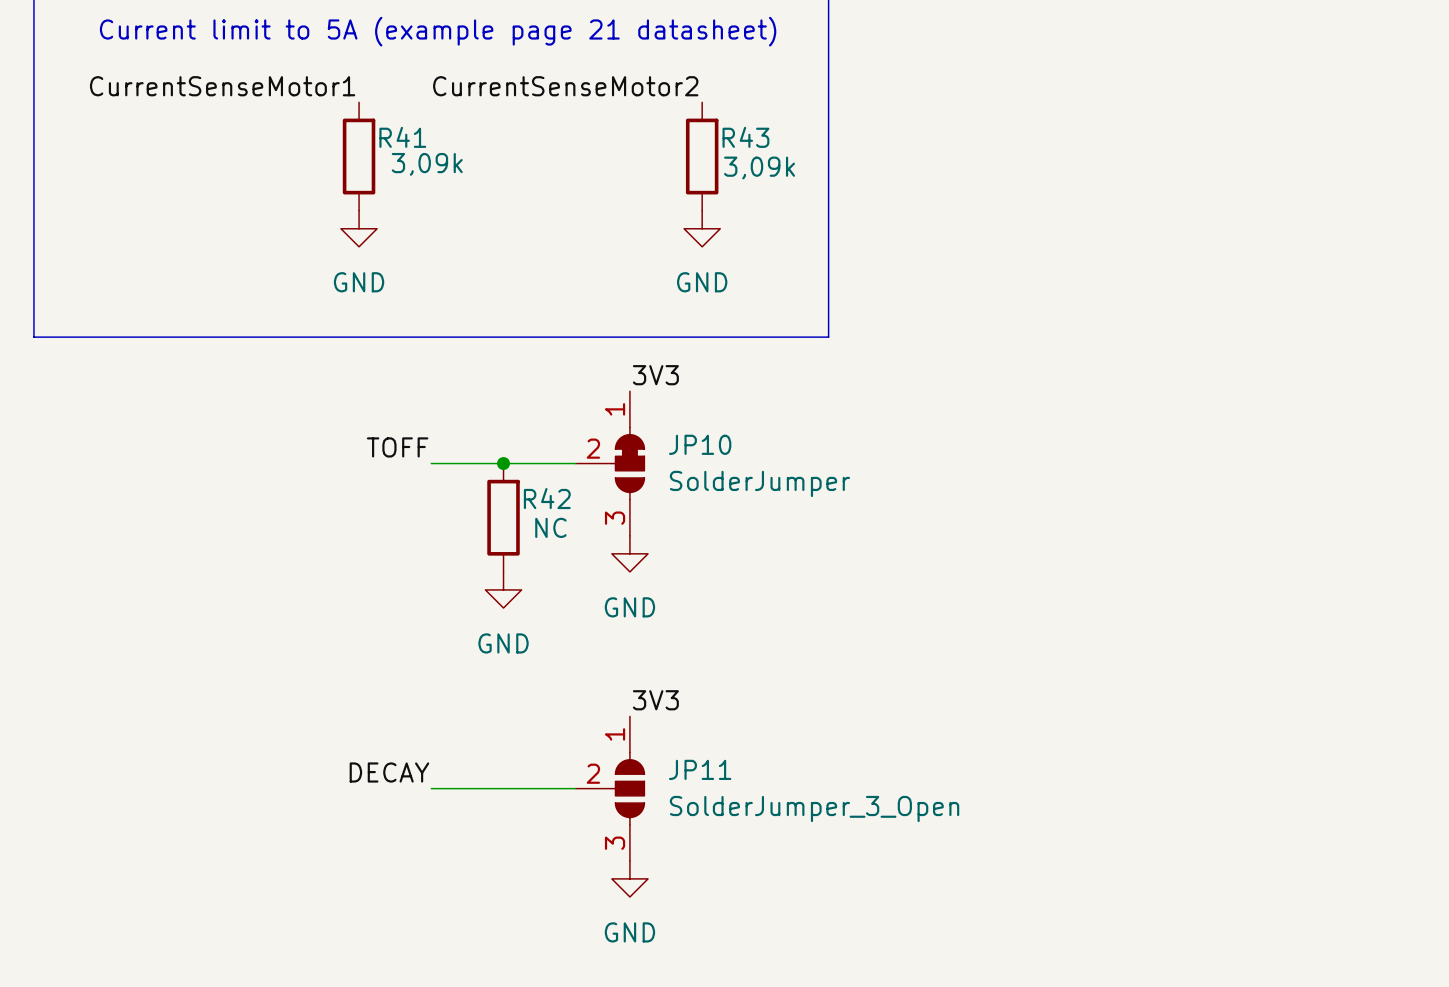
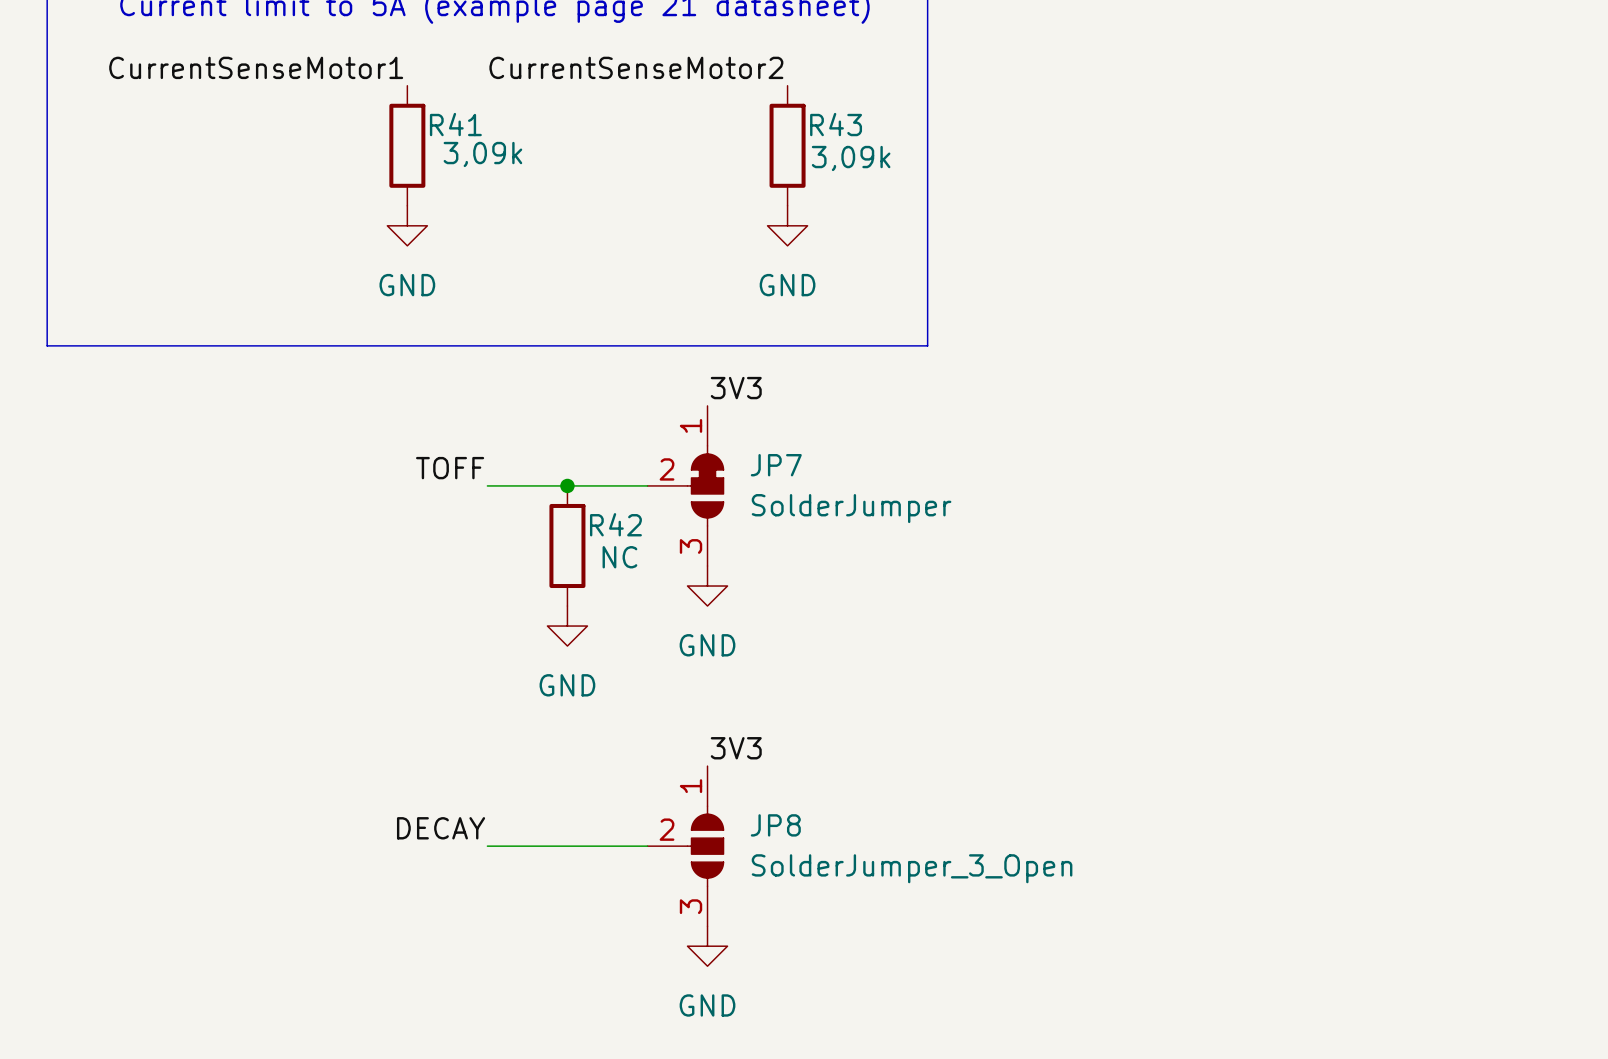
JP10 name: JP10 (700, 444) -> JP7 (776, 465)
JP11 name: JP11 (700, 769) -> JP8 (775, 825)

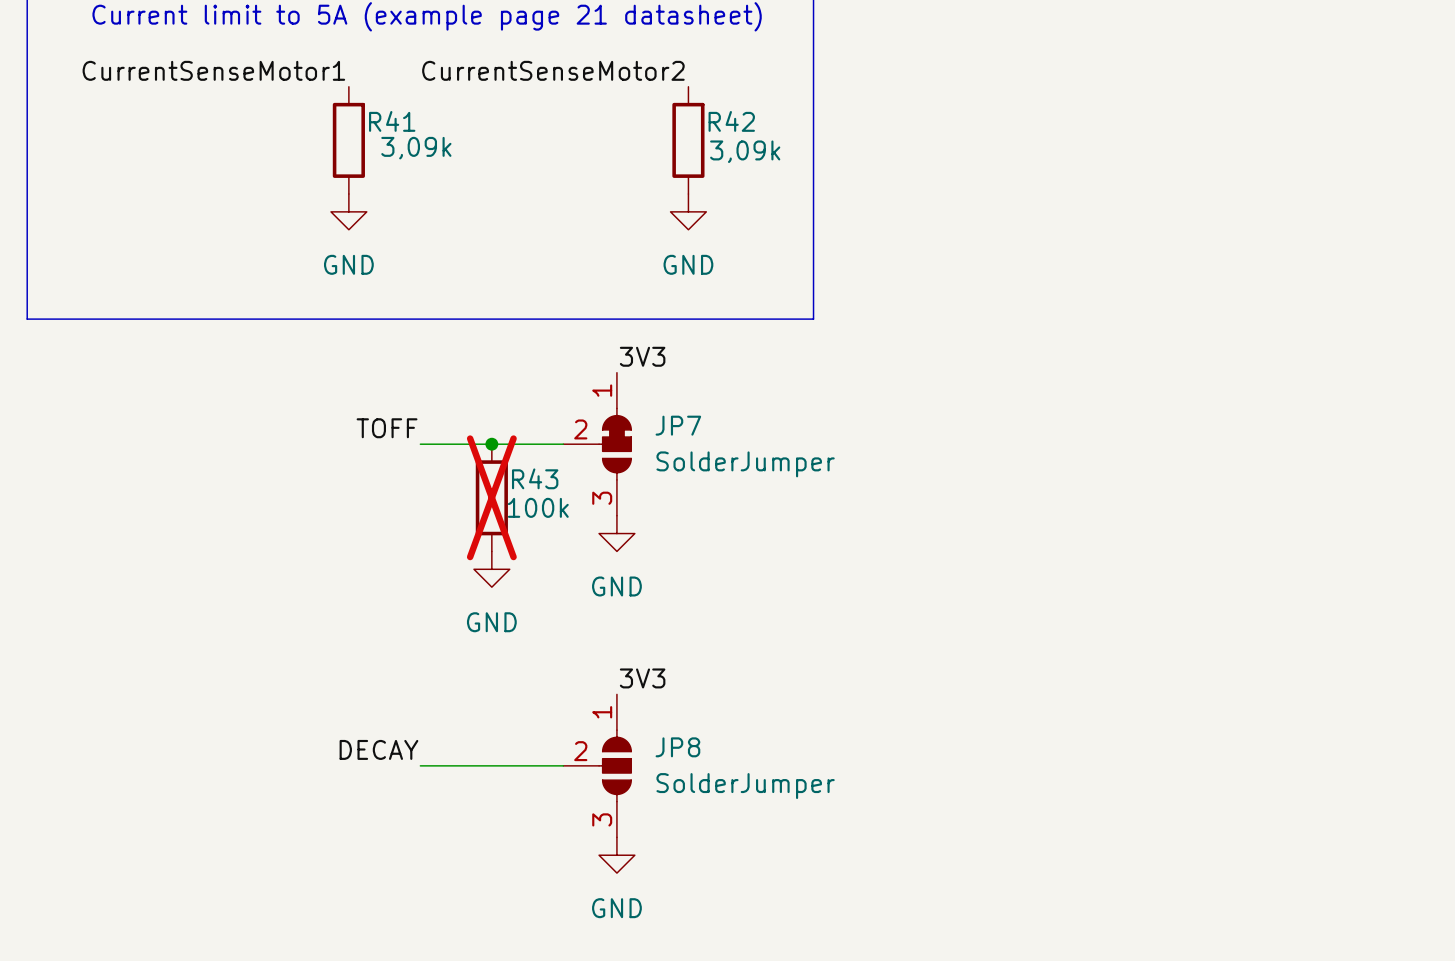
R43 name: R43 (836, 124) -> R42 (731, 121)
R42 name: R42 (615, 524) -> R43 (535, 478)
R42 do-not-place cross: none -> (491, 497)
R42 value: NC (619, 557) -> 100k (538, 507)
JP8 value: SolderJumper_3_Open (912, 868) -> SolderJumper (745, 786)

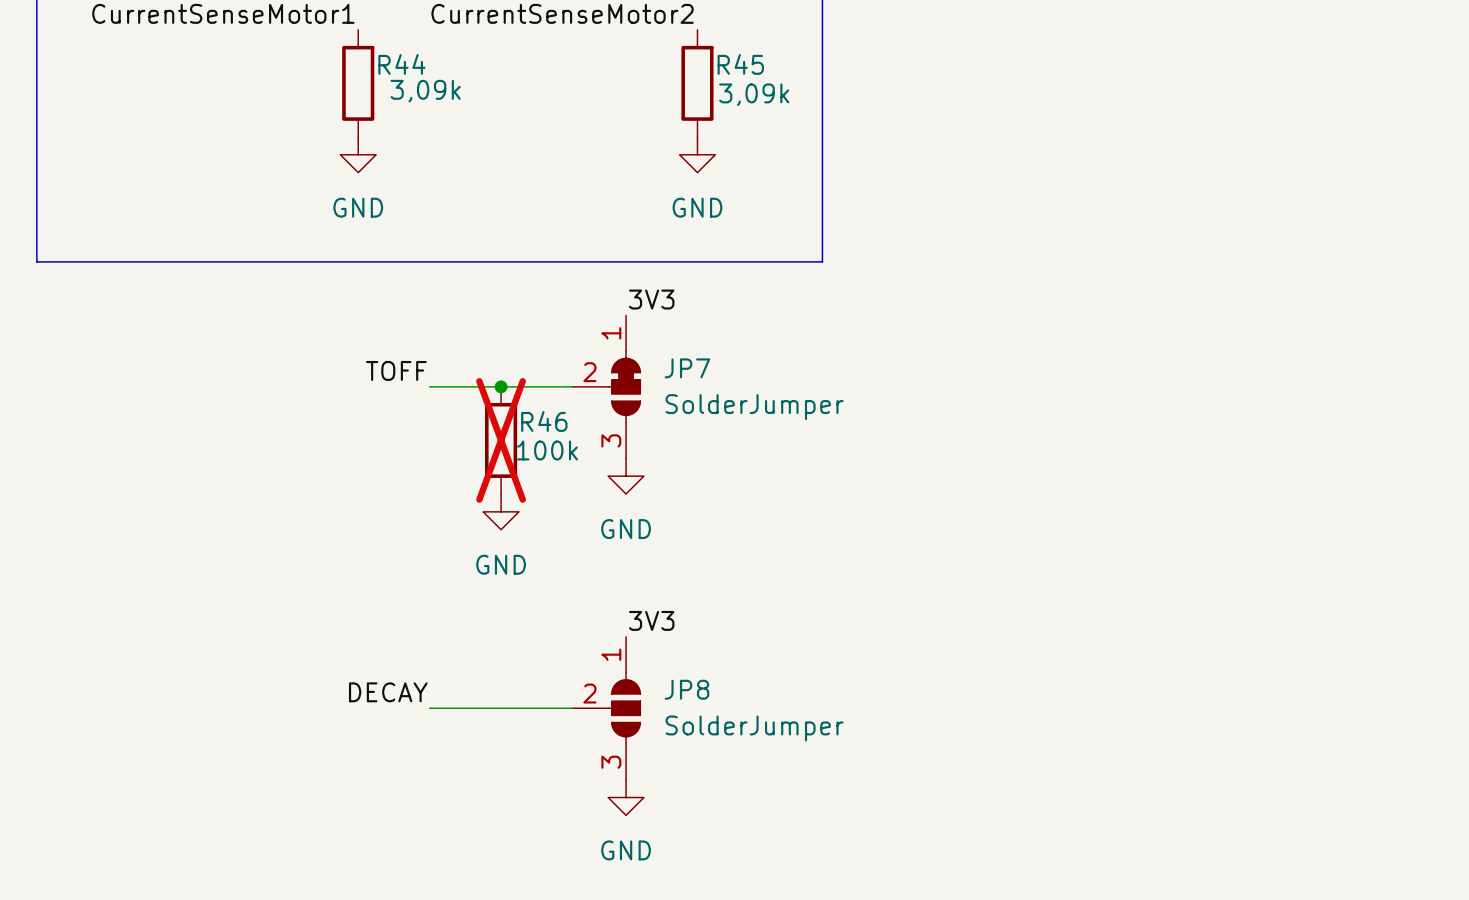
R41 name: R41 (392, 121) -> R44 (401, 64)
R42 name: R42 (731, 121) -> R45 (740, 64)
R43 name: R43 (535, 478) -> R46 (544, 421)

